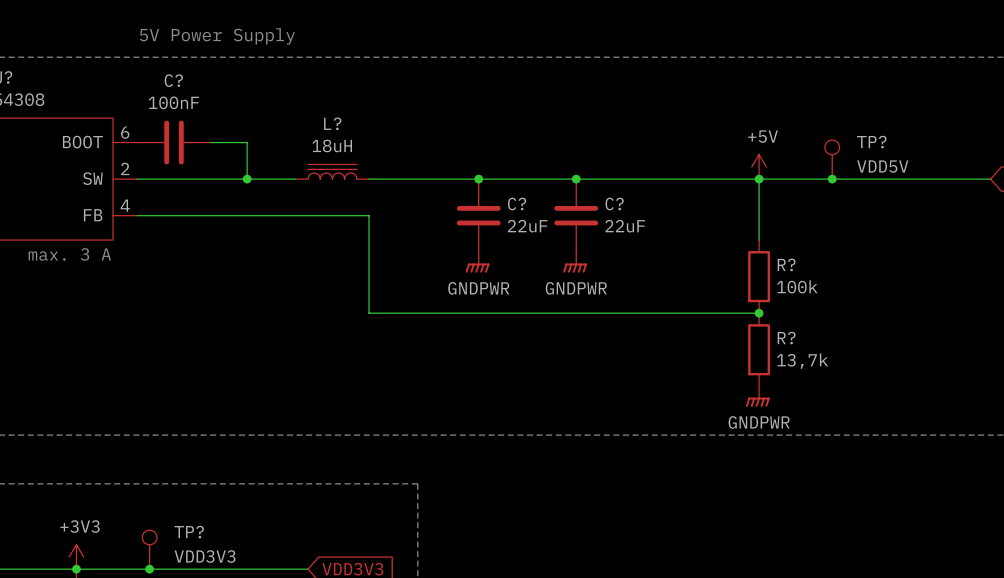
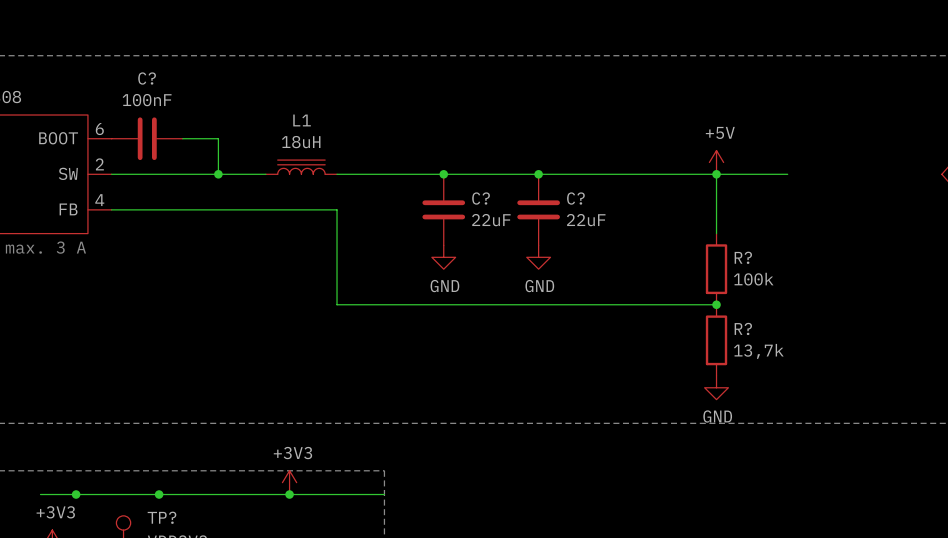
text: 5V Power Supply (217, 36) -> none
L? name: L? (332, 123) -> L1 (302, 120)
TP?: VDD5V (832, 159) -> none
wire: (832, 179) (990, 179) -> none
junction: (832, 179) -> none
power symbol: GNDPWR (477, 262) -> GND (443, 257)
power symbol: GNDPWR (575, 262) -> GND (538, 257)
power symbol: GNDPWR (757, 396) -> GND (716, 387)
power symbol: none -> +3V3 (289, 482)
wire: none -> (40, 494) (384, 494)
junction: none -> (76, 494)
junction: none -> (159, 494)
junction: none -> (289, 494)

